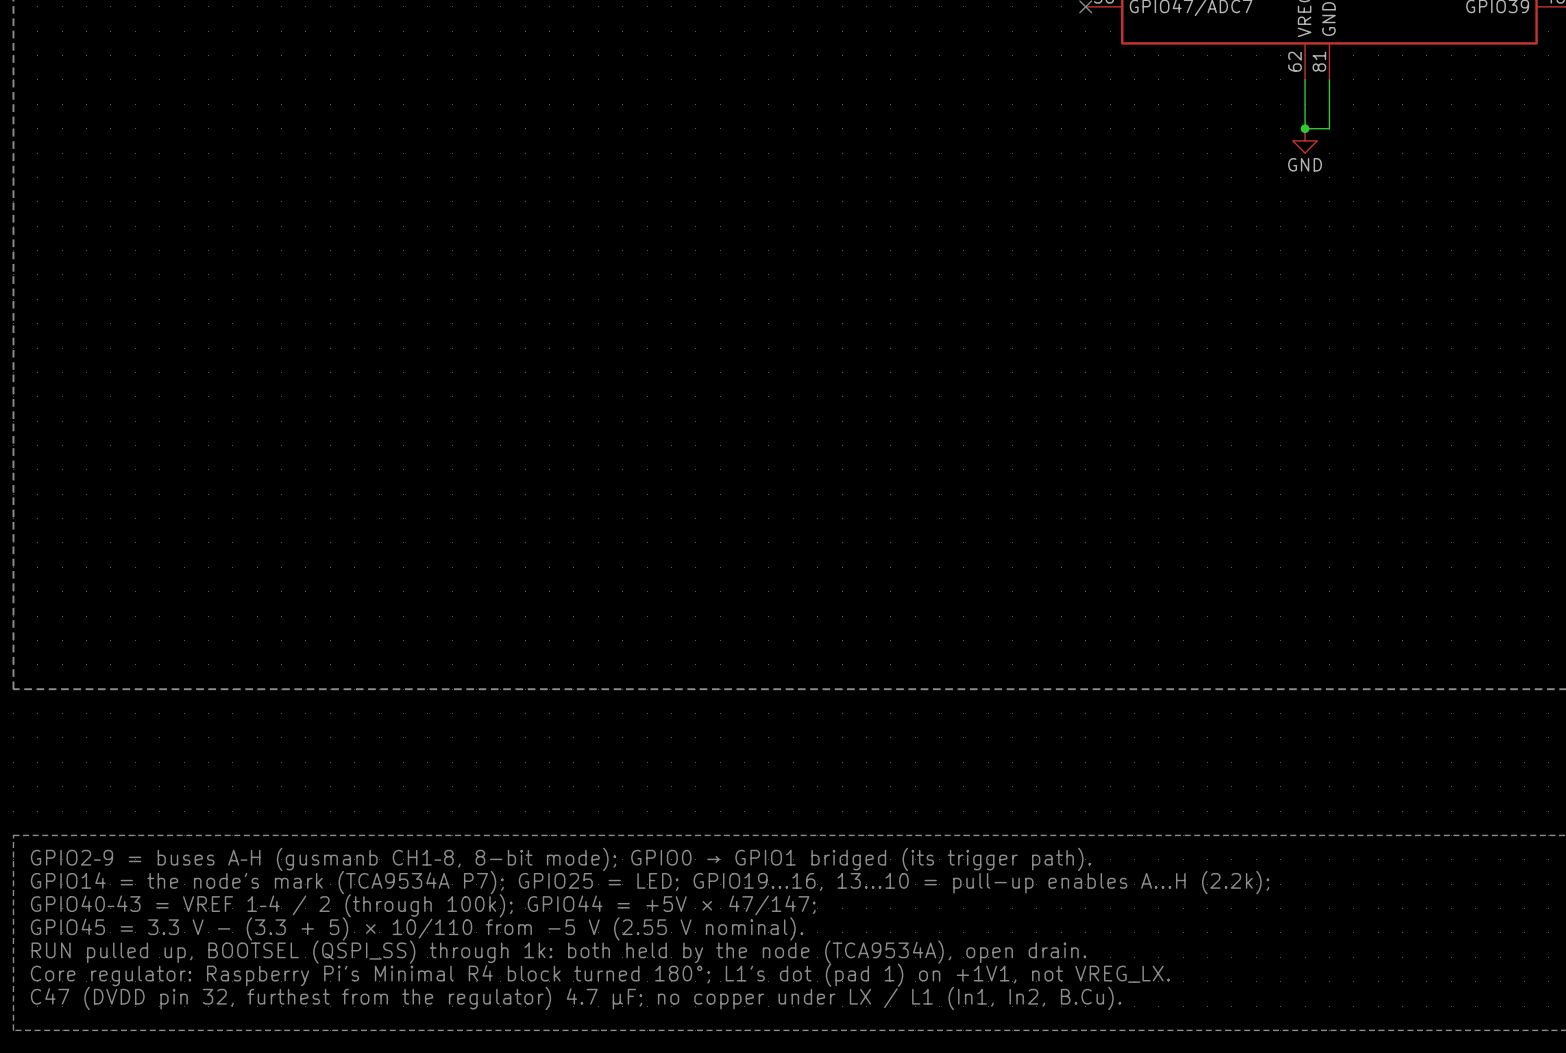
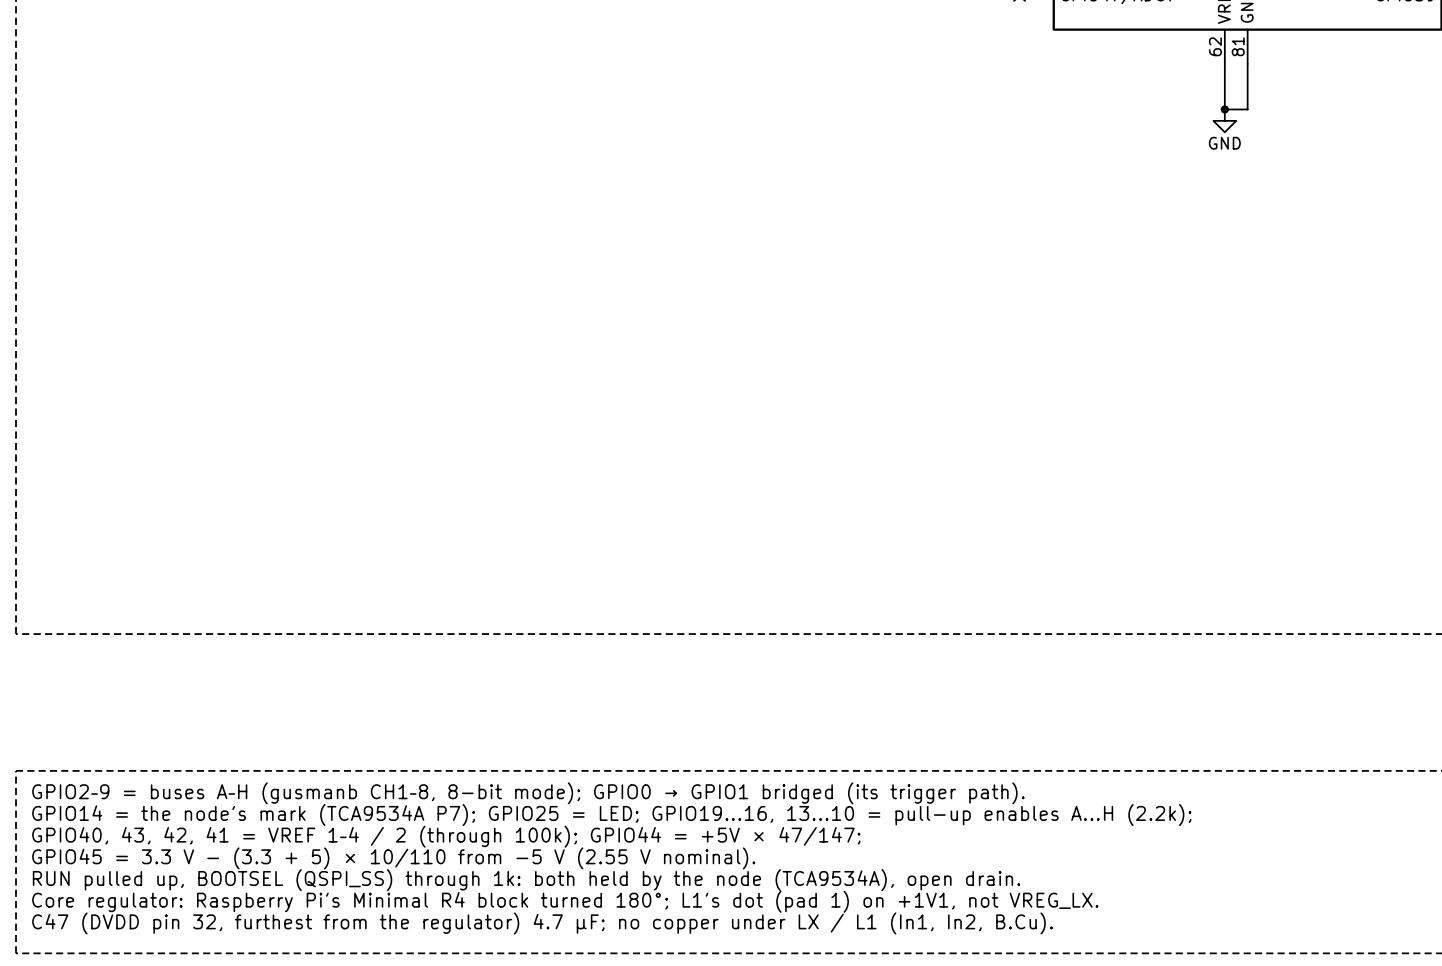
text: GPIO40–43 = VREF 1–4 / 2 (through 100k); GPIO44 = +5V × 47/147; (423, 905) -> GPIO40, 43, 42, 41 = VREF 1–4 / 2 (through 100k); GPIO44 = +5V × 47/147; (446, 836)

